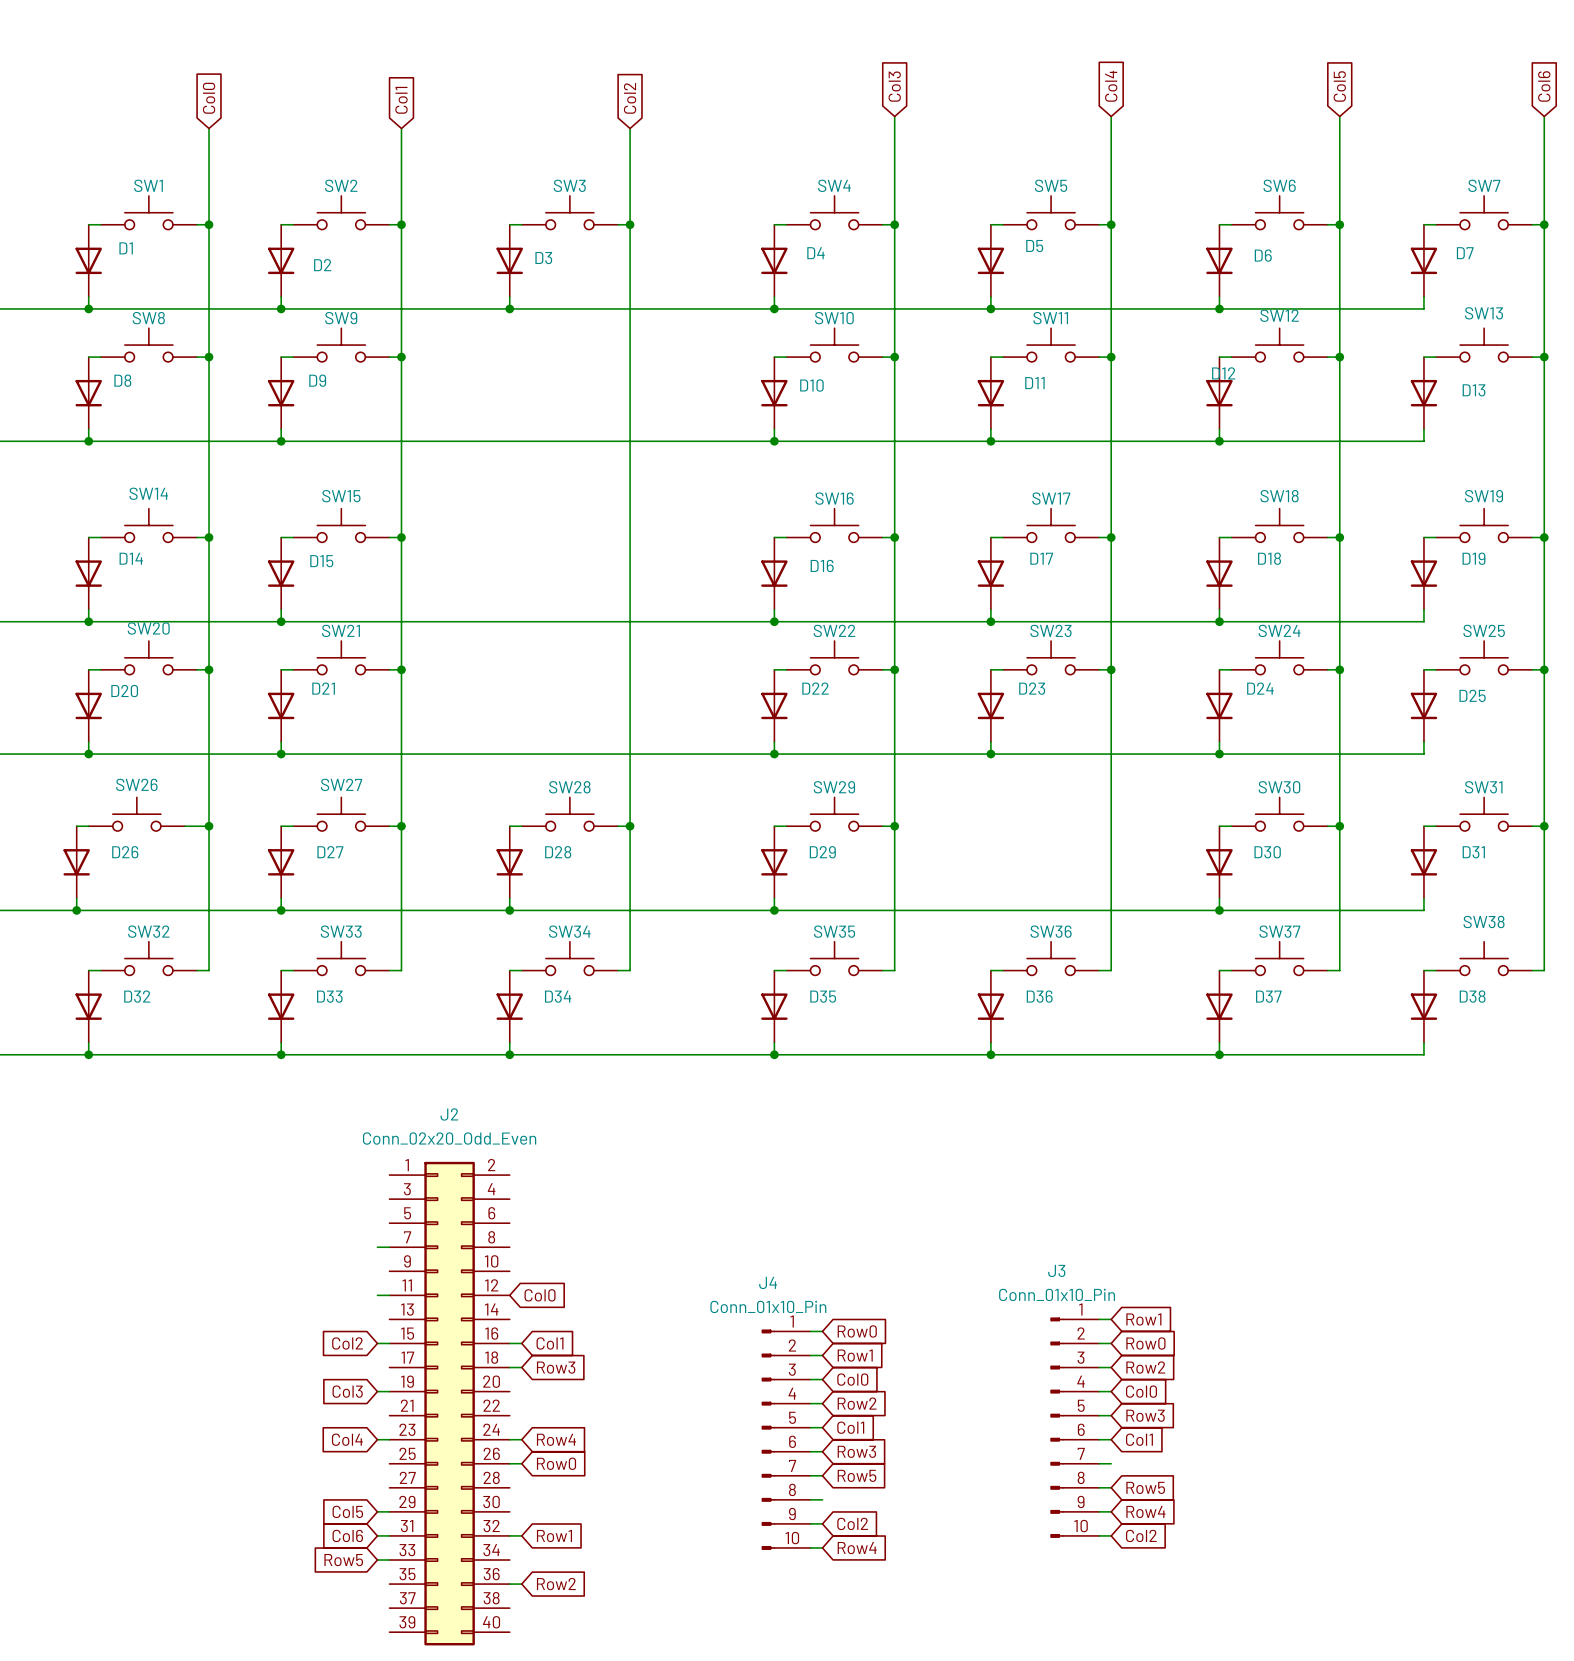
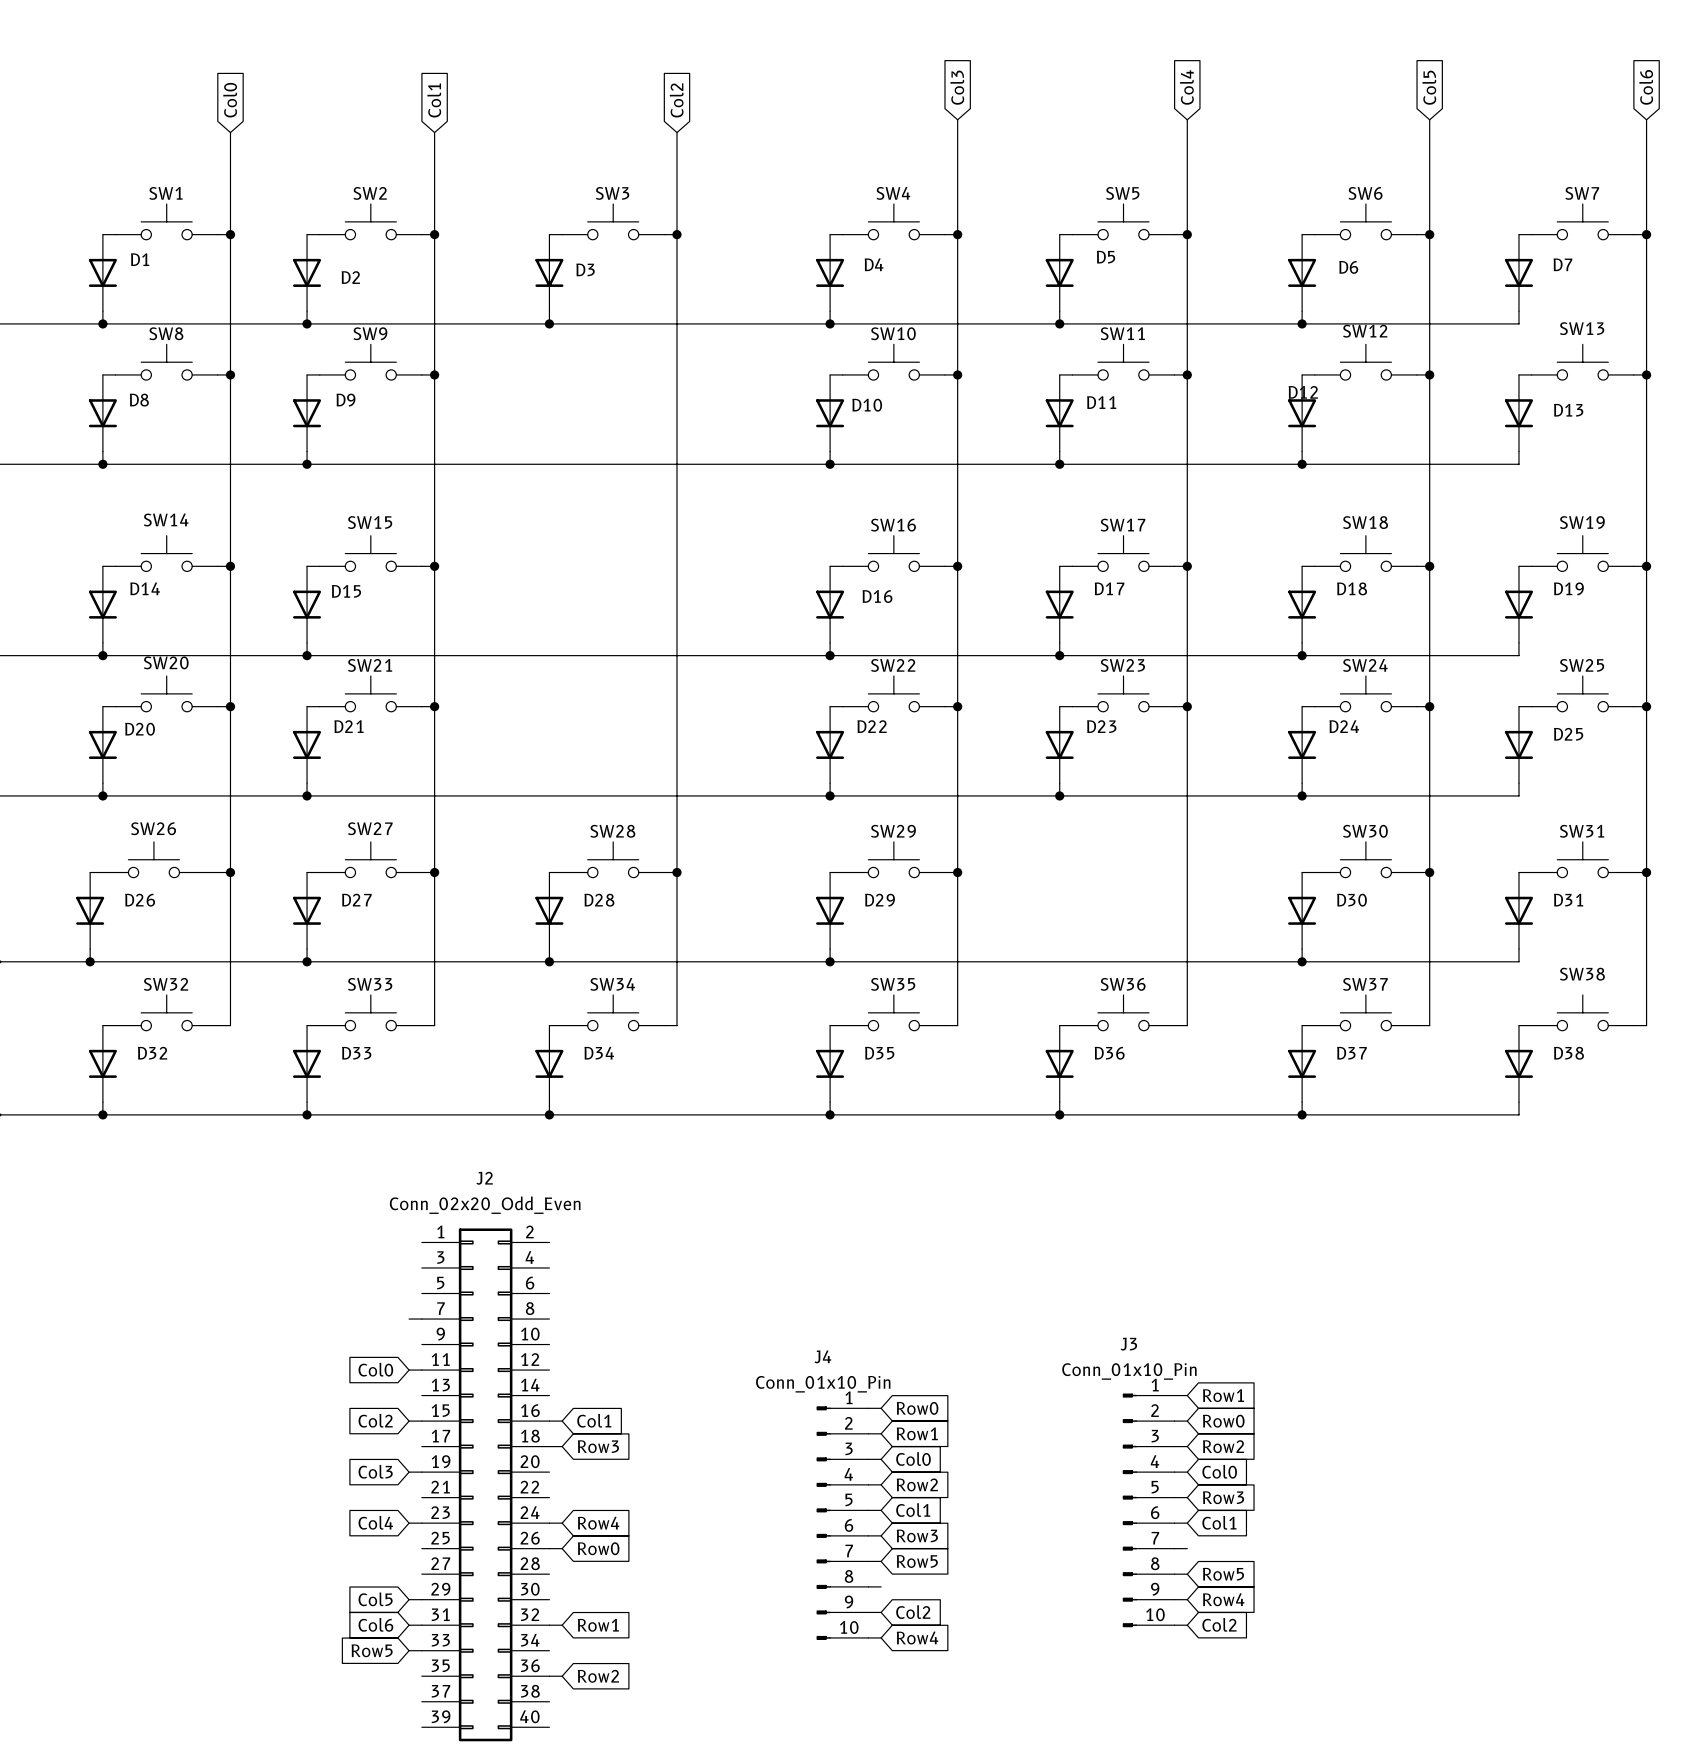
global label rotation: 0° (540, 1295) -> 180° (375, 1369)
global label position: Col0 (540, 1295) -> Col0 (375, 1369)

